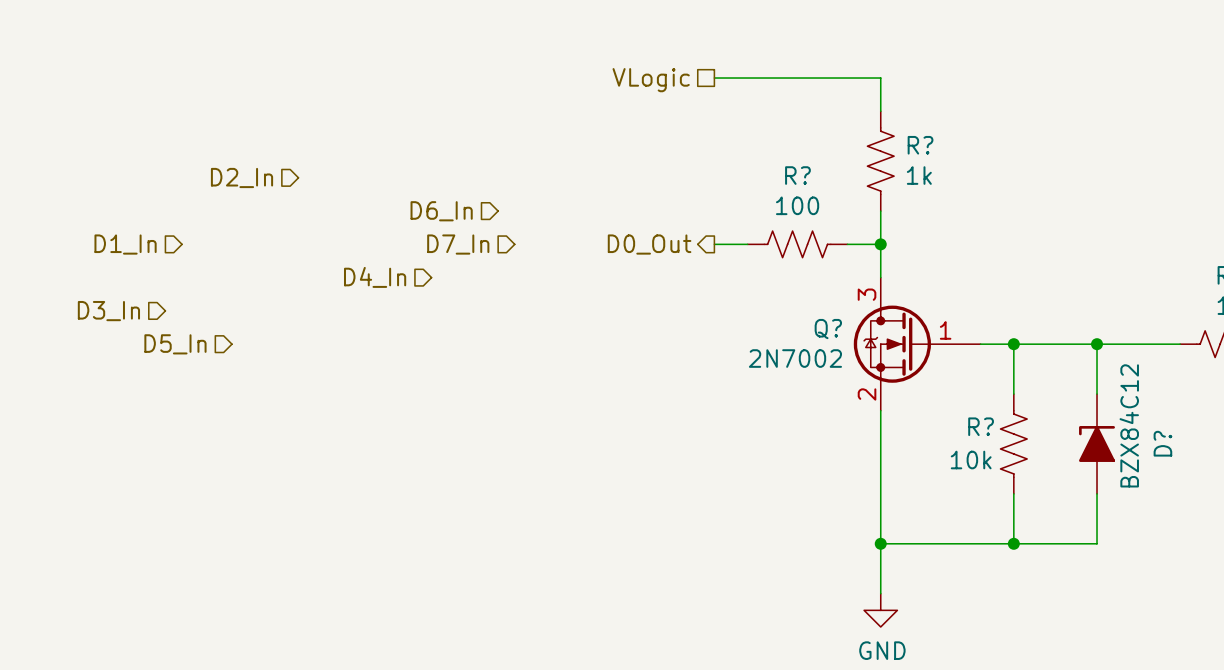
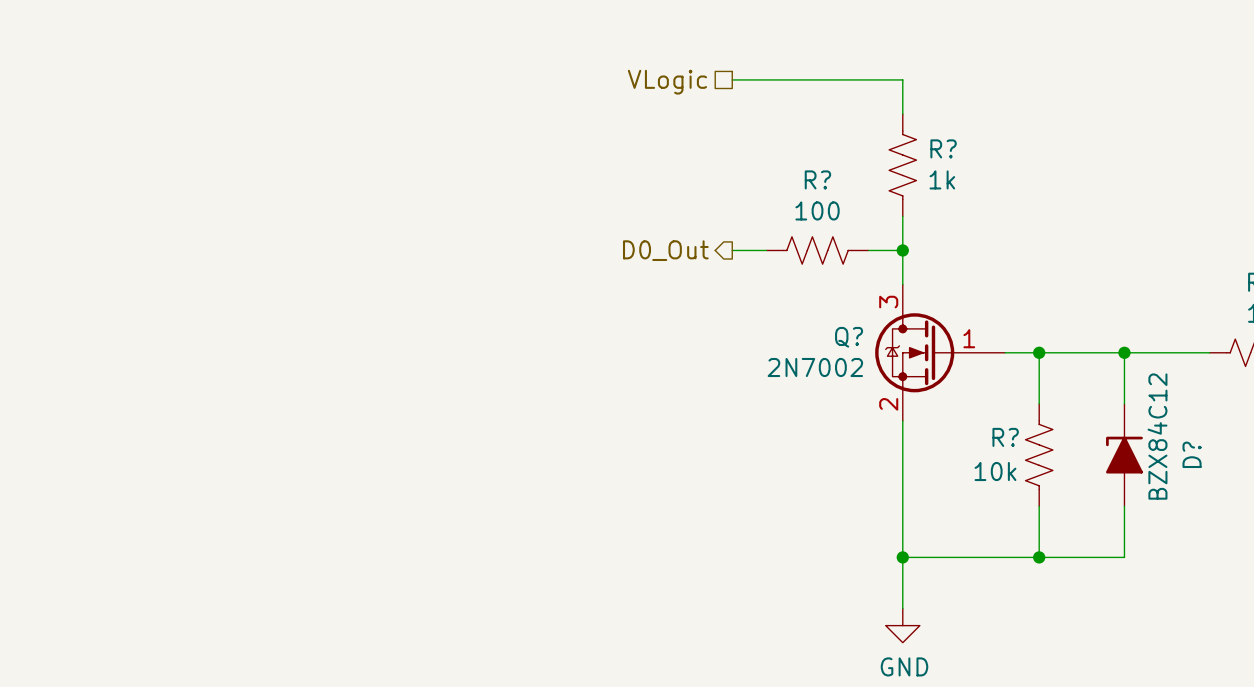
hierarchical label: D2_In (242, 177) -> none
hierarchical label: D6_In (441, 211) -> none
hierarchical label: D1_In (125, 244) -> none
hierarchical label: D7_In (458, 244) -> none
hierarchical label: D4_In (375, 277) -> none
hierarchical label: D3_In (108, 311) -> none
hierarchical label: D5_In (175, 344) -> none

